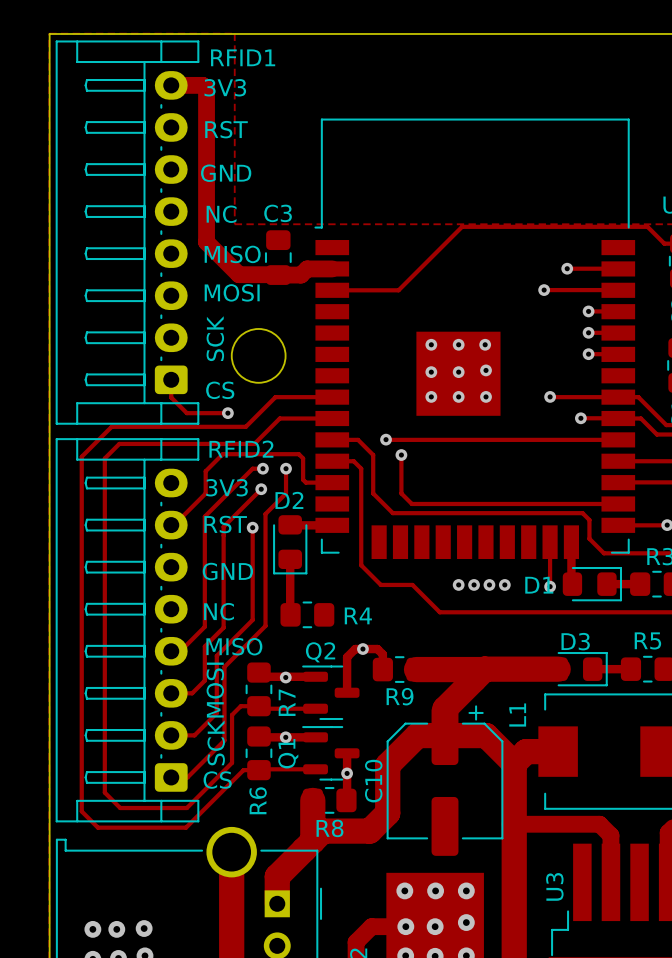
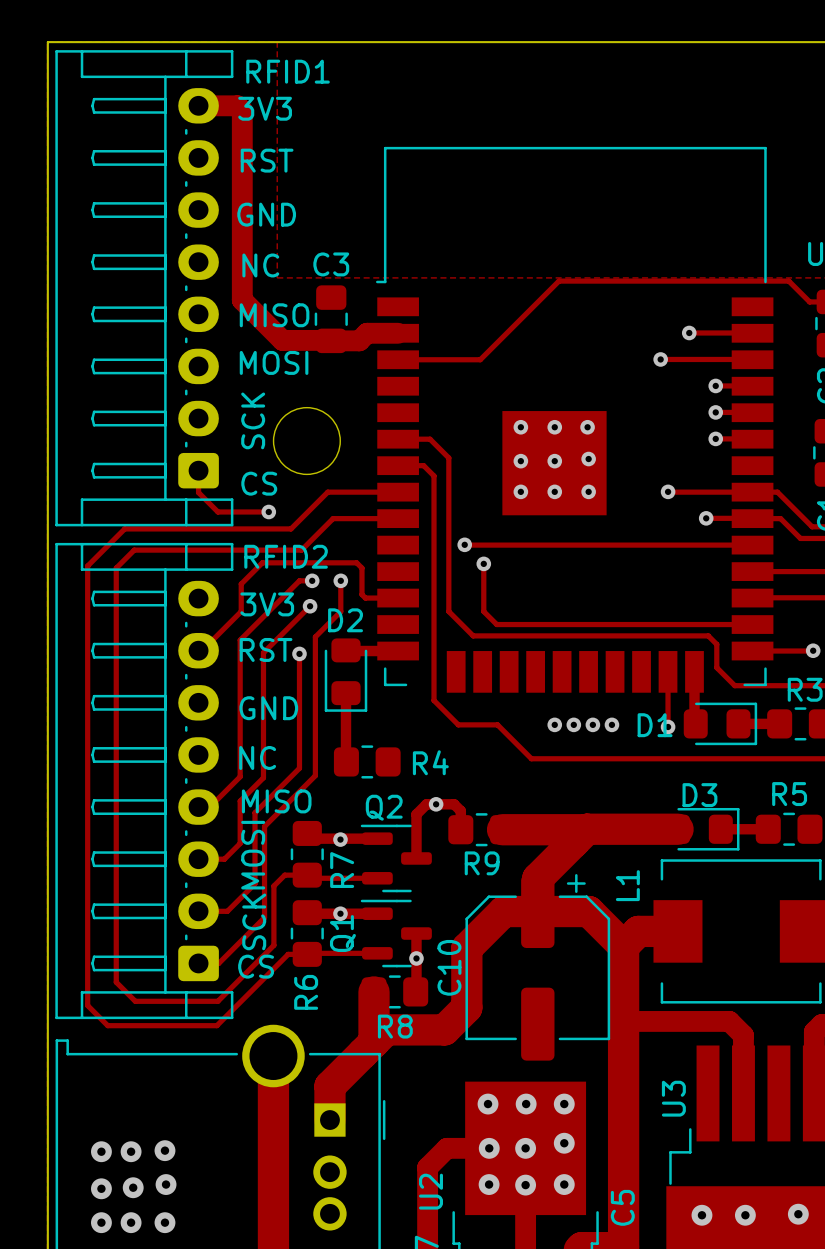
track: (332, 439) (358, 439) (373, 455) -> (398, 439) (430, 439) (448, 457) (448, 563)
track: (332, 461) (353, 461) (361, 468) -> (398, 465) (423, 465) (434, 475) (434, 580)

